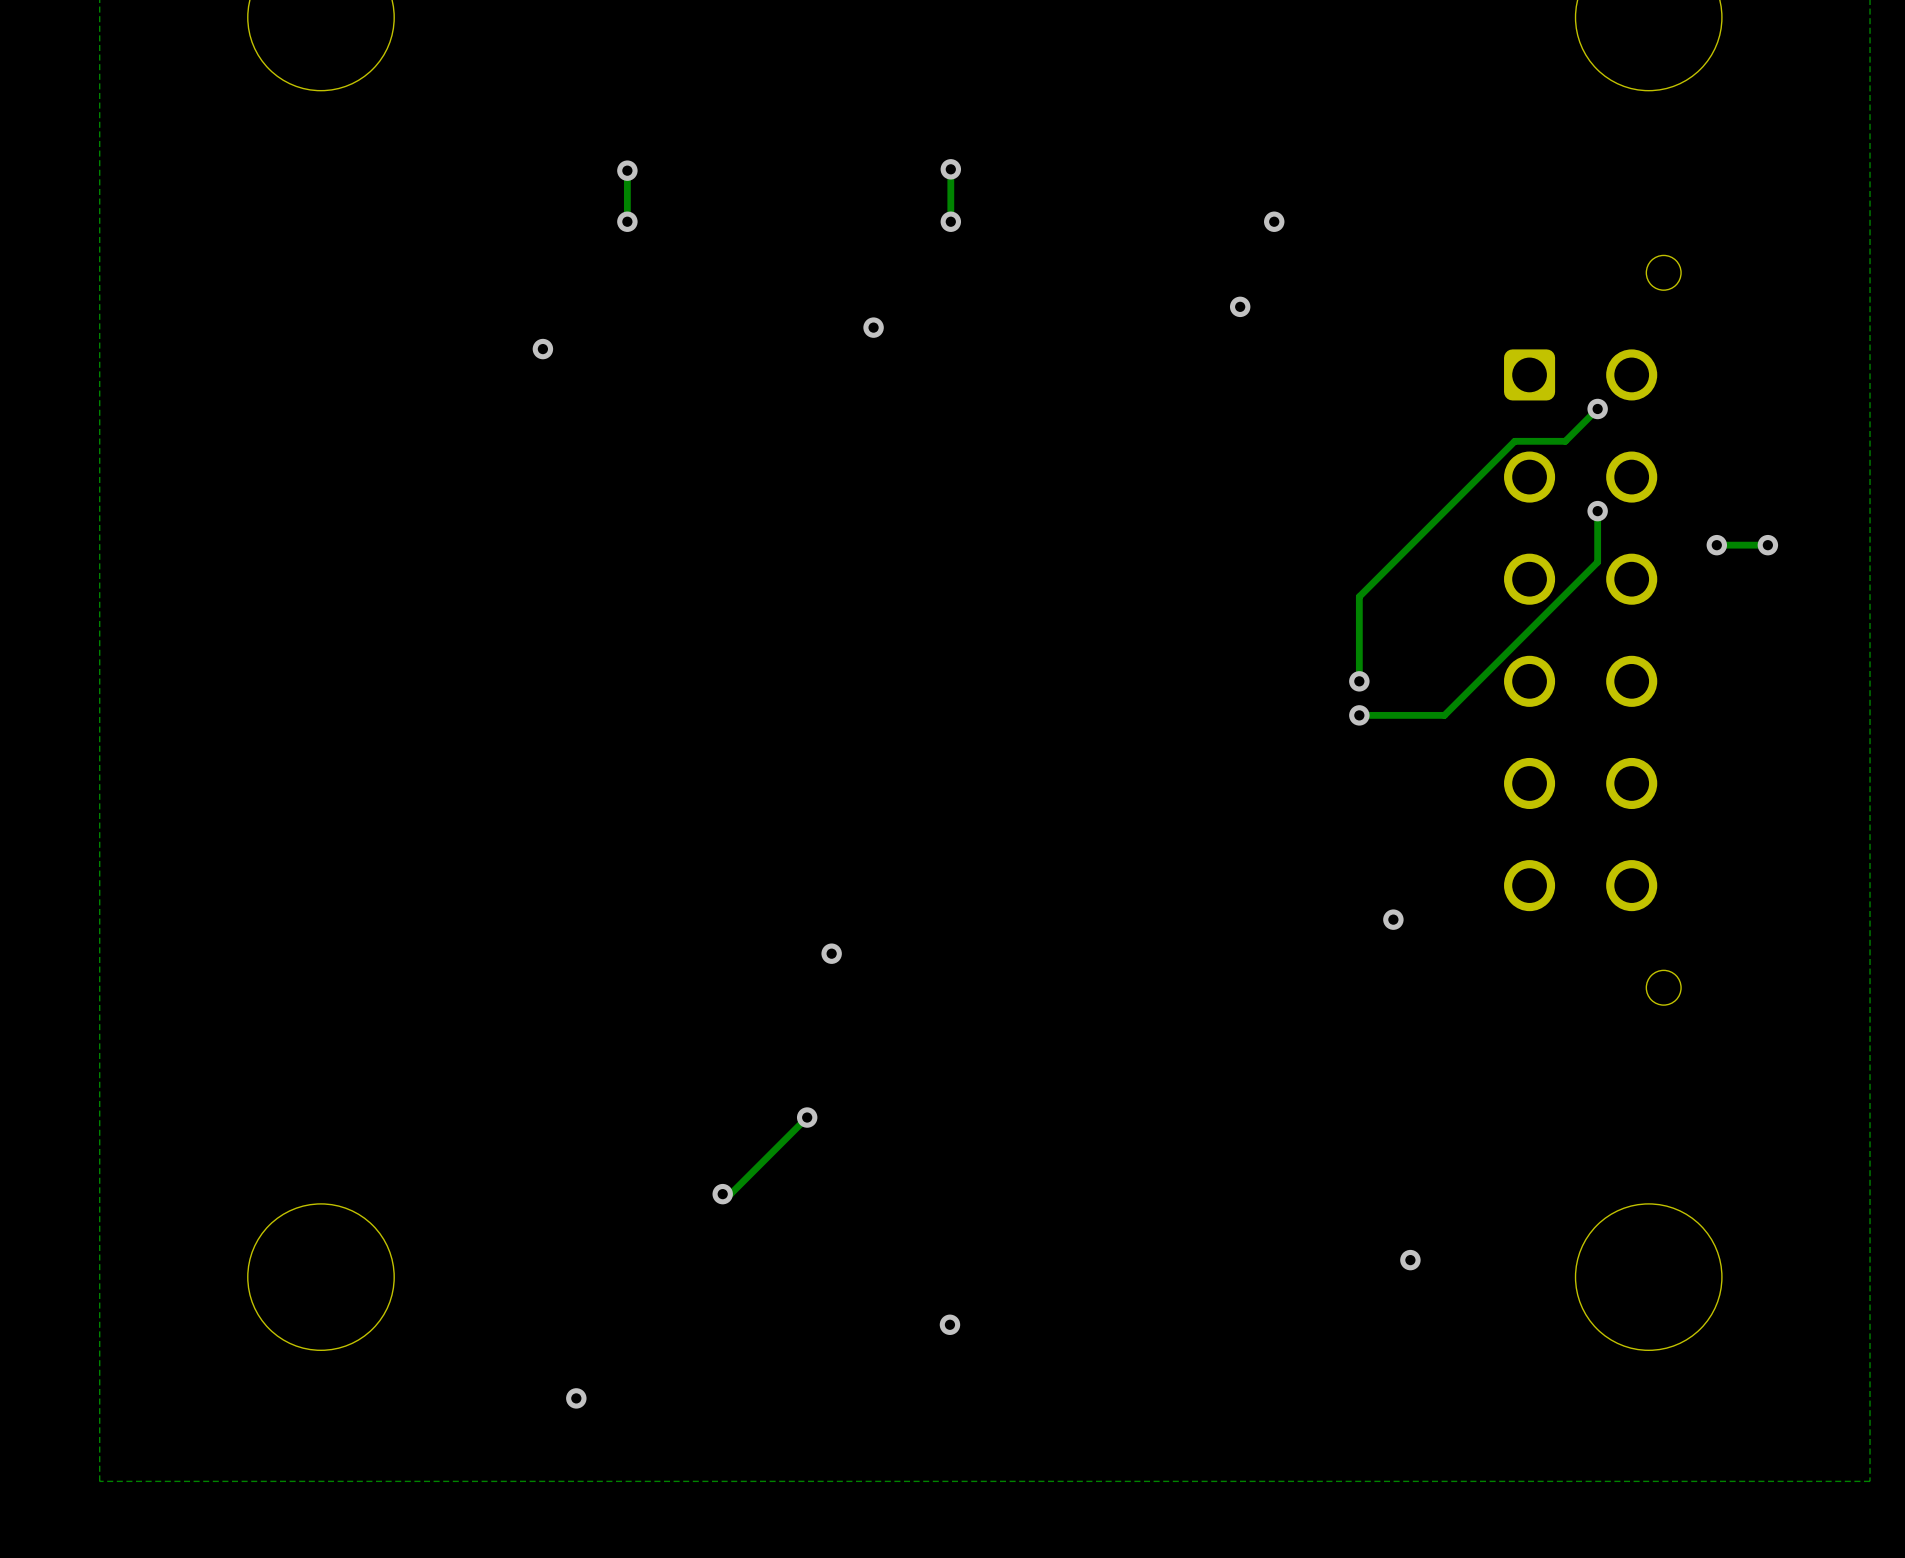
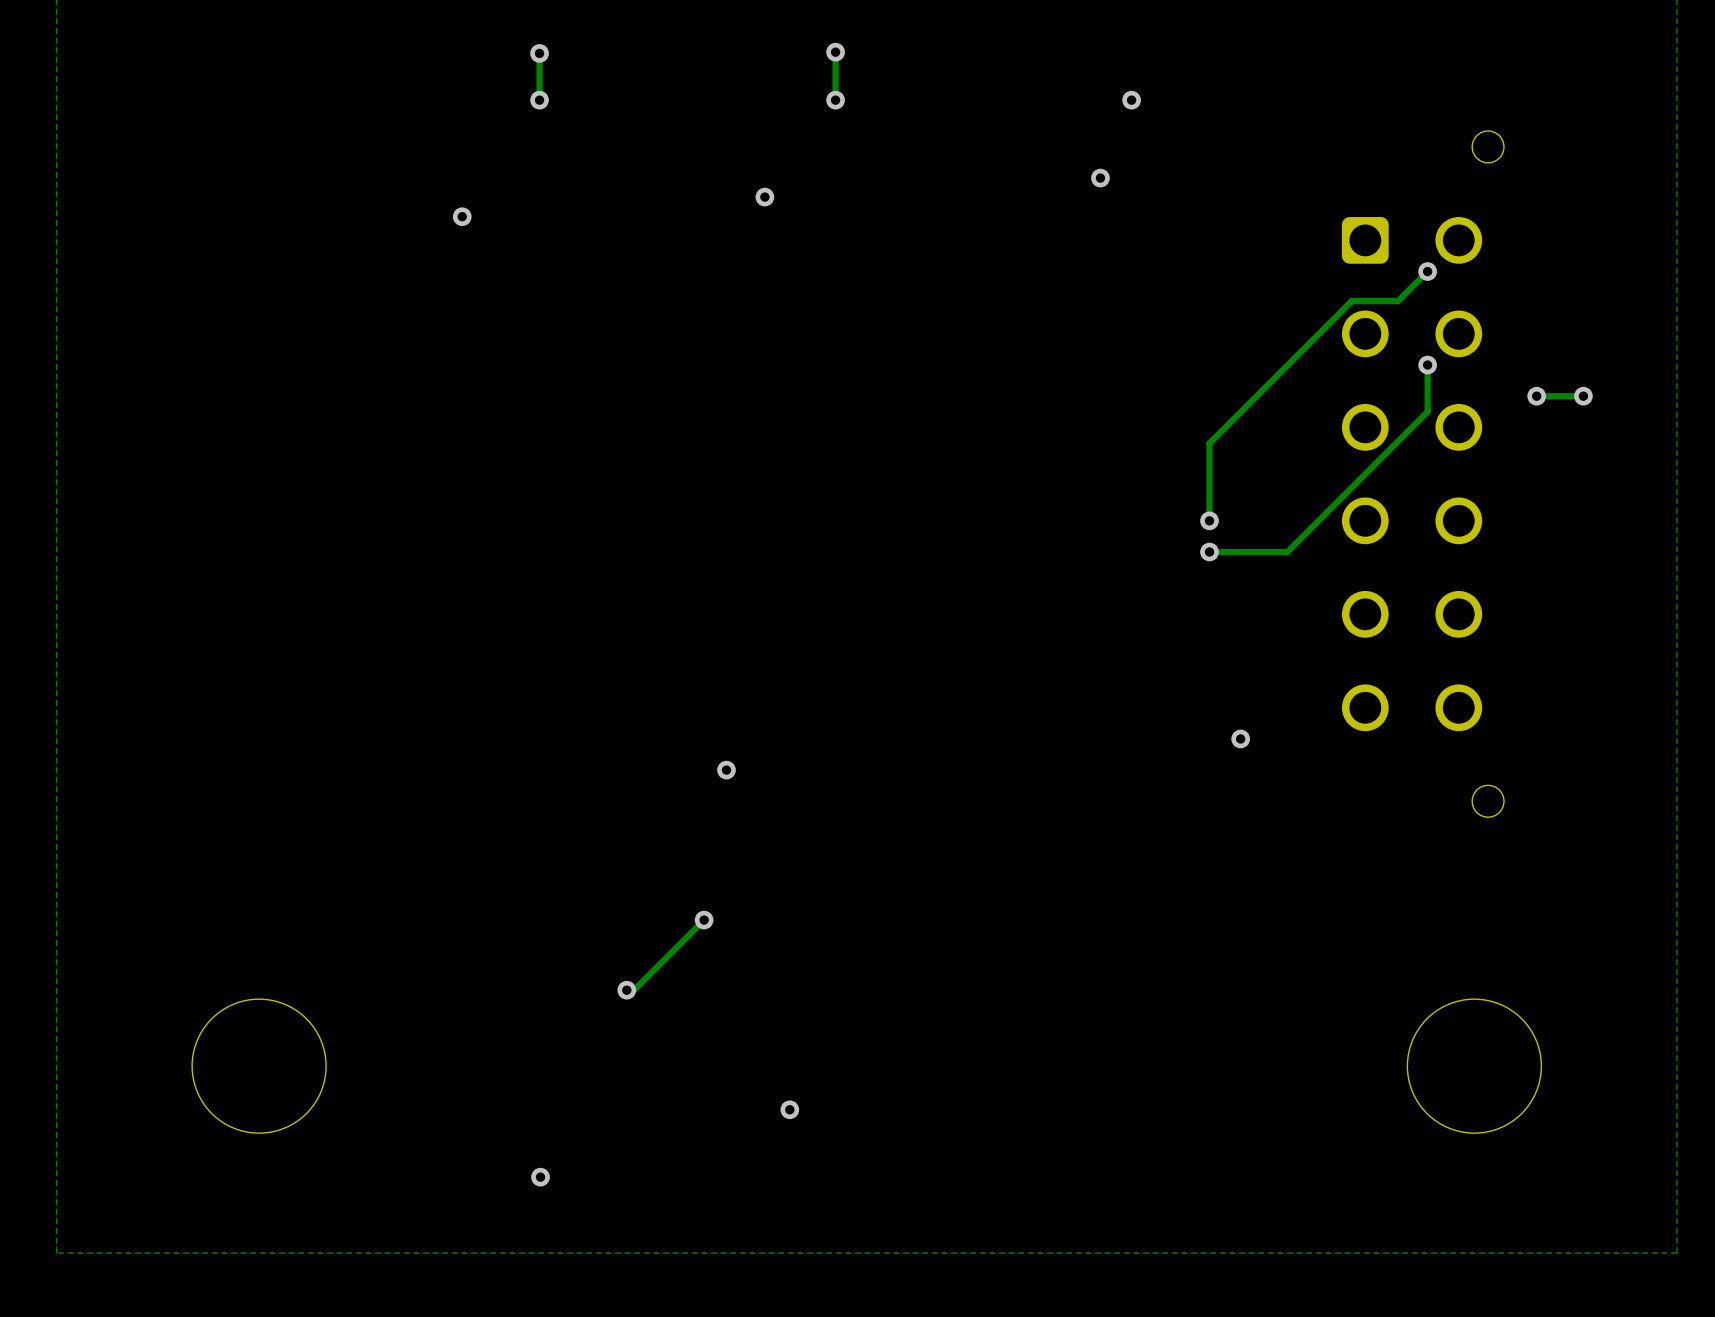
via: (1410, 1260) -> none
via position: (949, 1324) -> (789, 1109)
via position: (576, 1398) -> (540, 1177)

